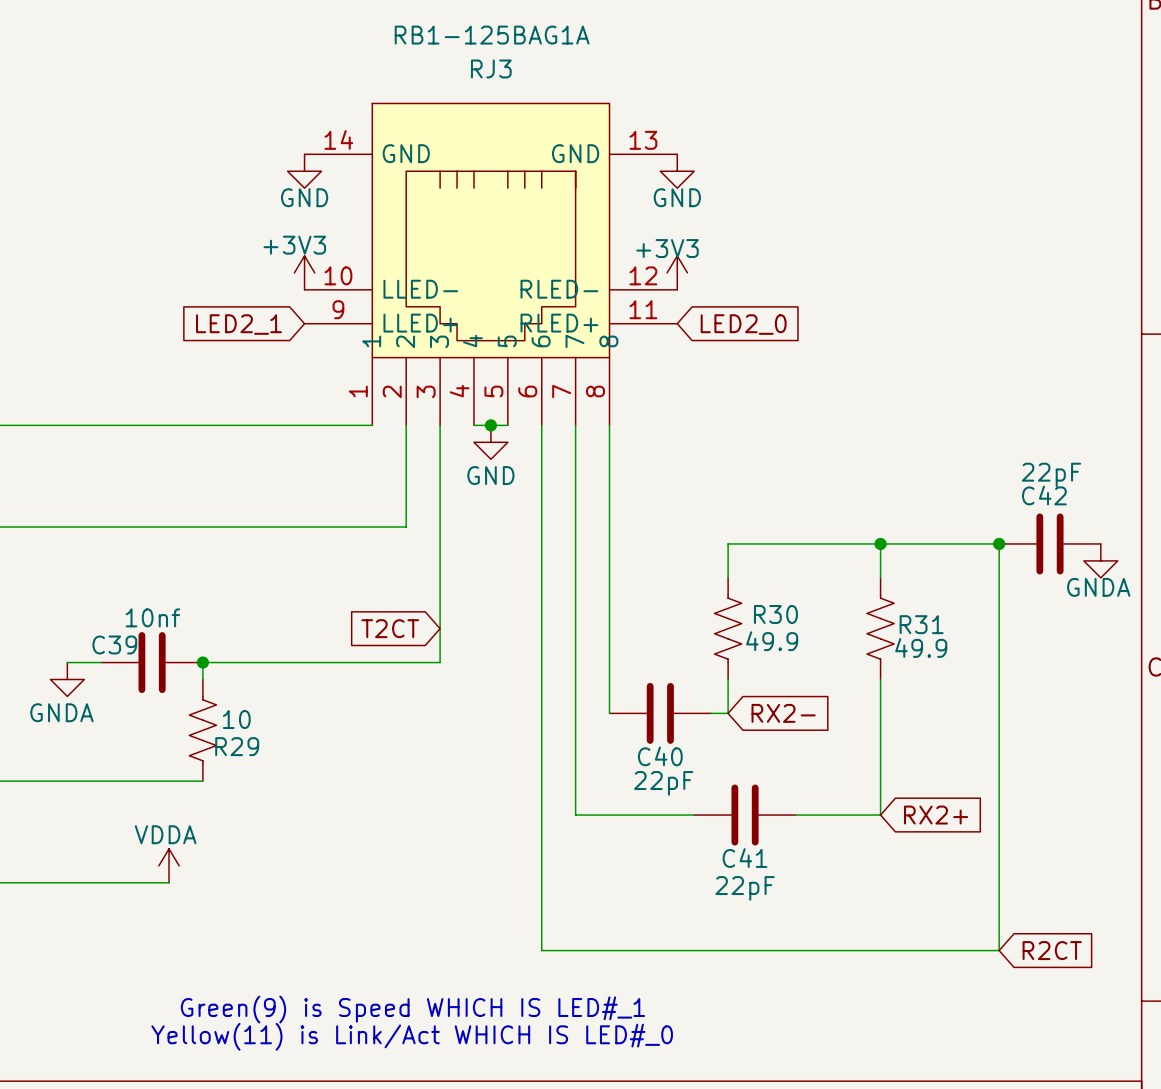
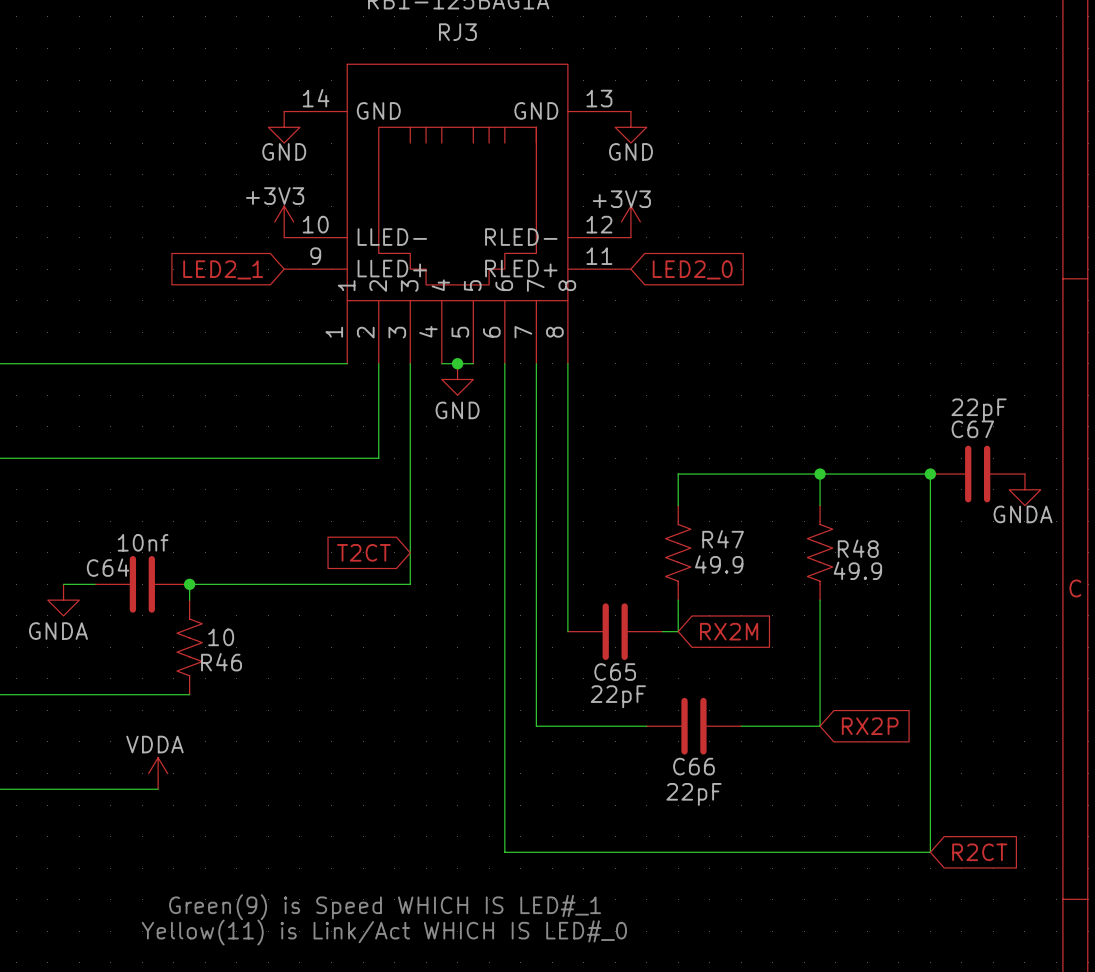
C42 name: C42 (1044, 495) -> C67 (972, 429)
R30 name: R30 (775, 614) -> R47 (723, 539)
R31 name: R31 (921, 624) -> R48 (858, 548)
C39 name: C39 (114, 644) -> C64 (108, 567)
global label: RX2- (783, 713) -> RX2M (729, 631)
R29 name: R29 (237, 746) -> R46 (221, 662)
C40 name: C40 (660, 756) -> C65 (615, 672)
global label: RX2+ (936, 815) -> RX2P (870, 726)
C41 name: C41 (745, 858) -> C66 (693, 766)

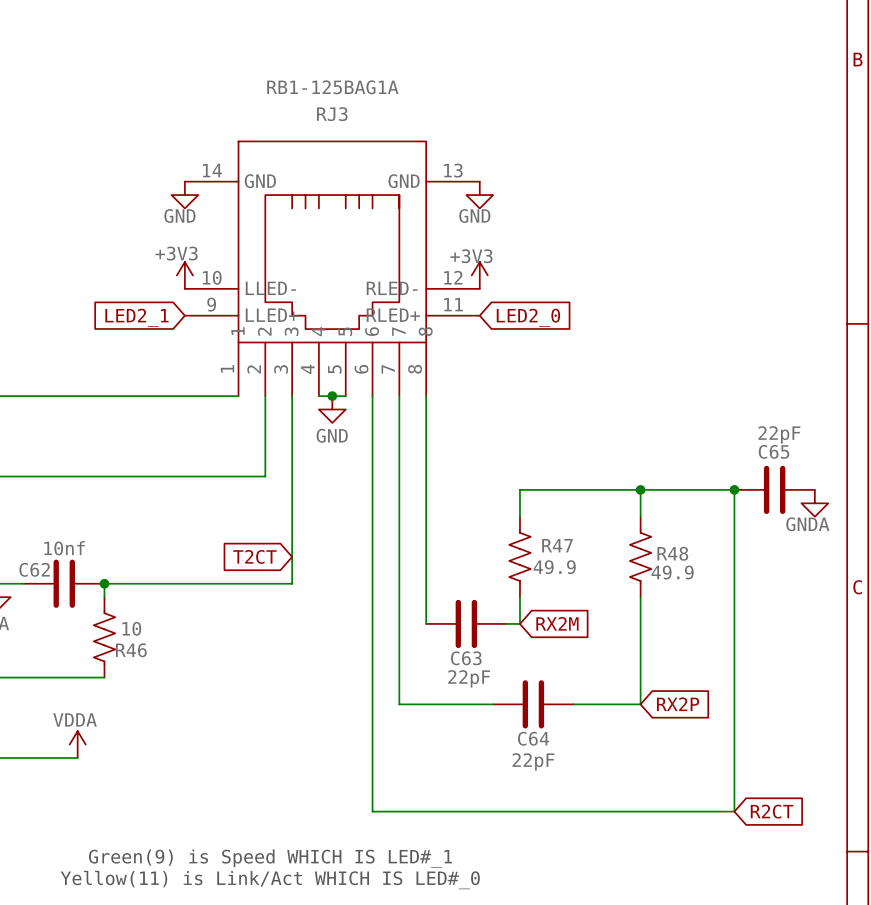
C67 name: C67 (972, 429) -> C65 (774, 451)
C64 name: C64 (108, 567) -> C62 (34, 569)
C65 name: C65 (615, 672) -> C63 (466, 658)
C66 name: C66 (693, 766) -> C64 (533, 738)

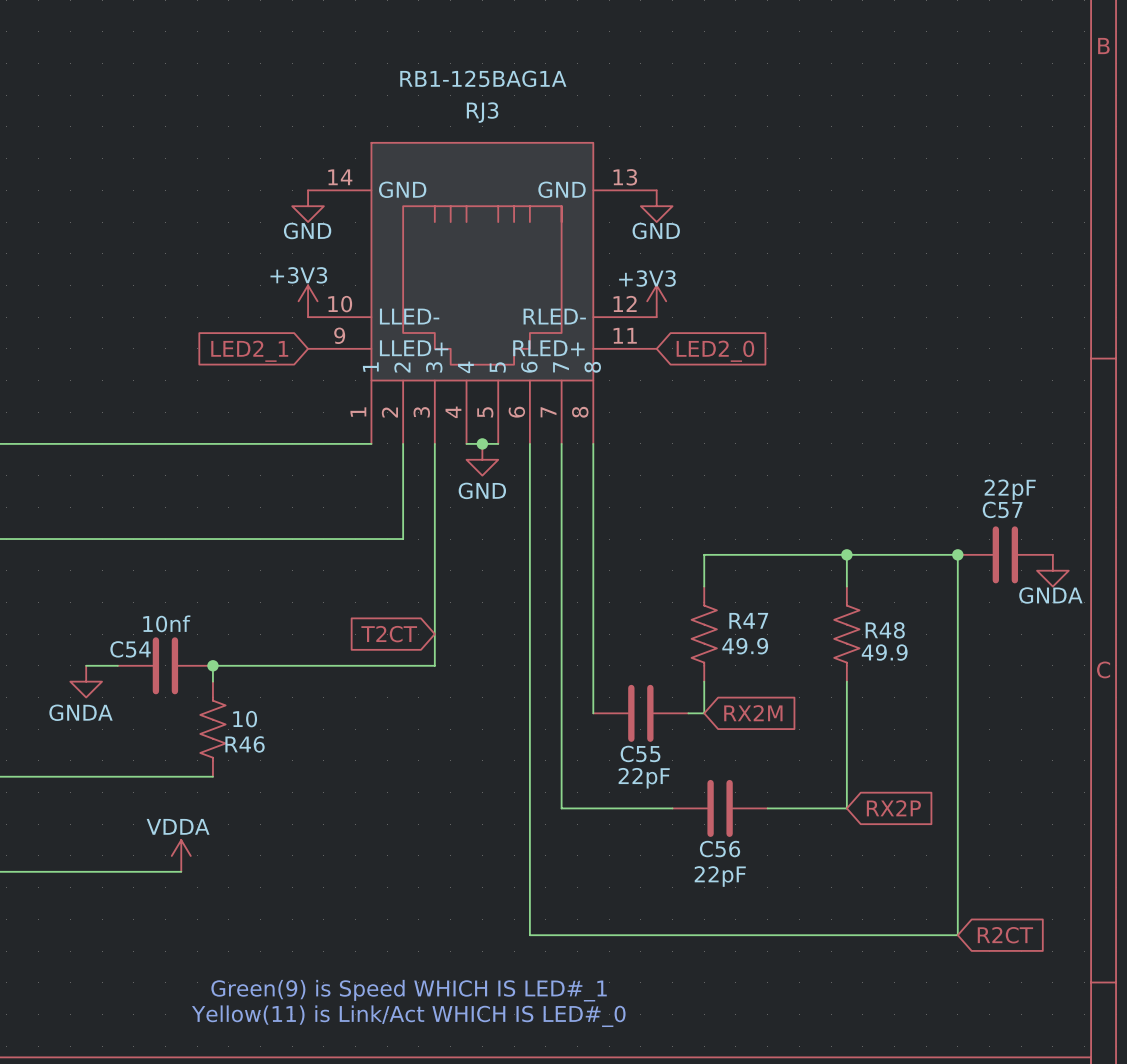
C65 name: C65 (774, 451) -> C57 (1002, 509)
C62 name: C62 (34, 569) -> C54 (130, 649)
C63 name: C63 (466, 658) -> C55 (640, 753)
C64 name: C64 (533, 738) -> C56 (720, 849)

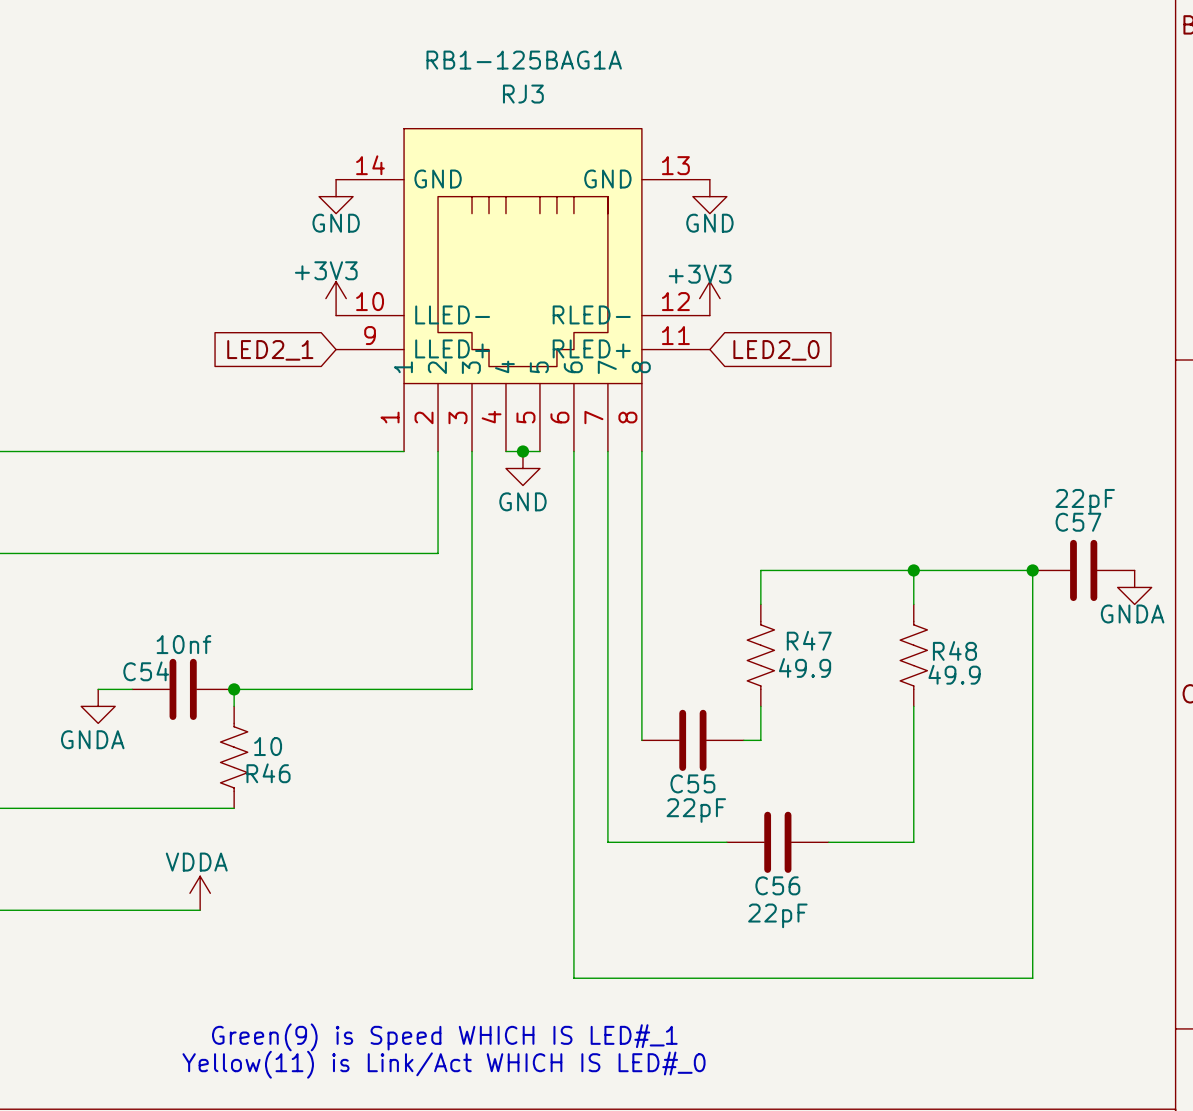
global label: T2CT (389, 634) -> none
global label: RX2M (753, 713) -> none
global label: RX2P (893, 808) -> none
global label: R2CT (1005, 935) -> none

